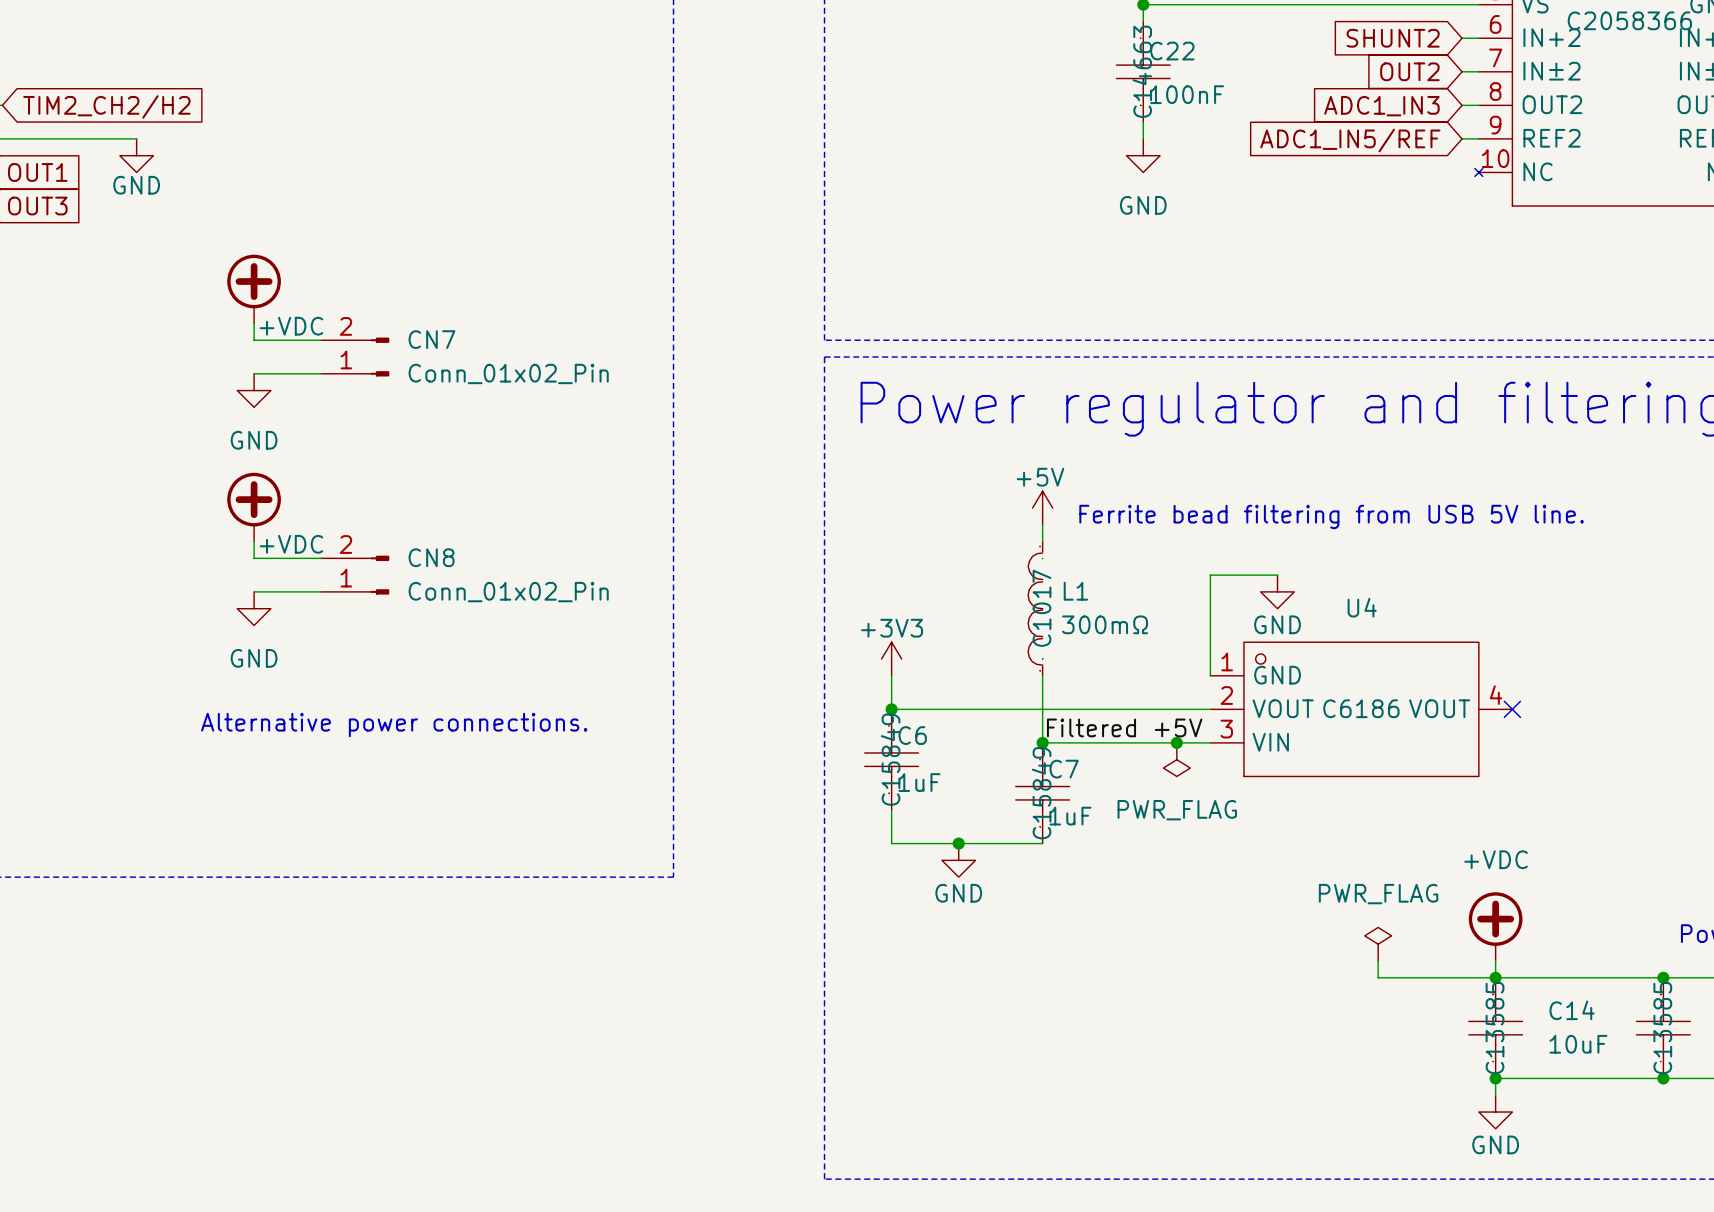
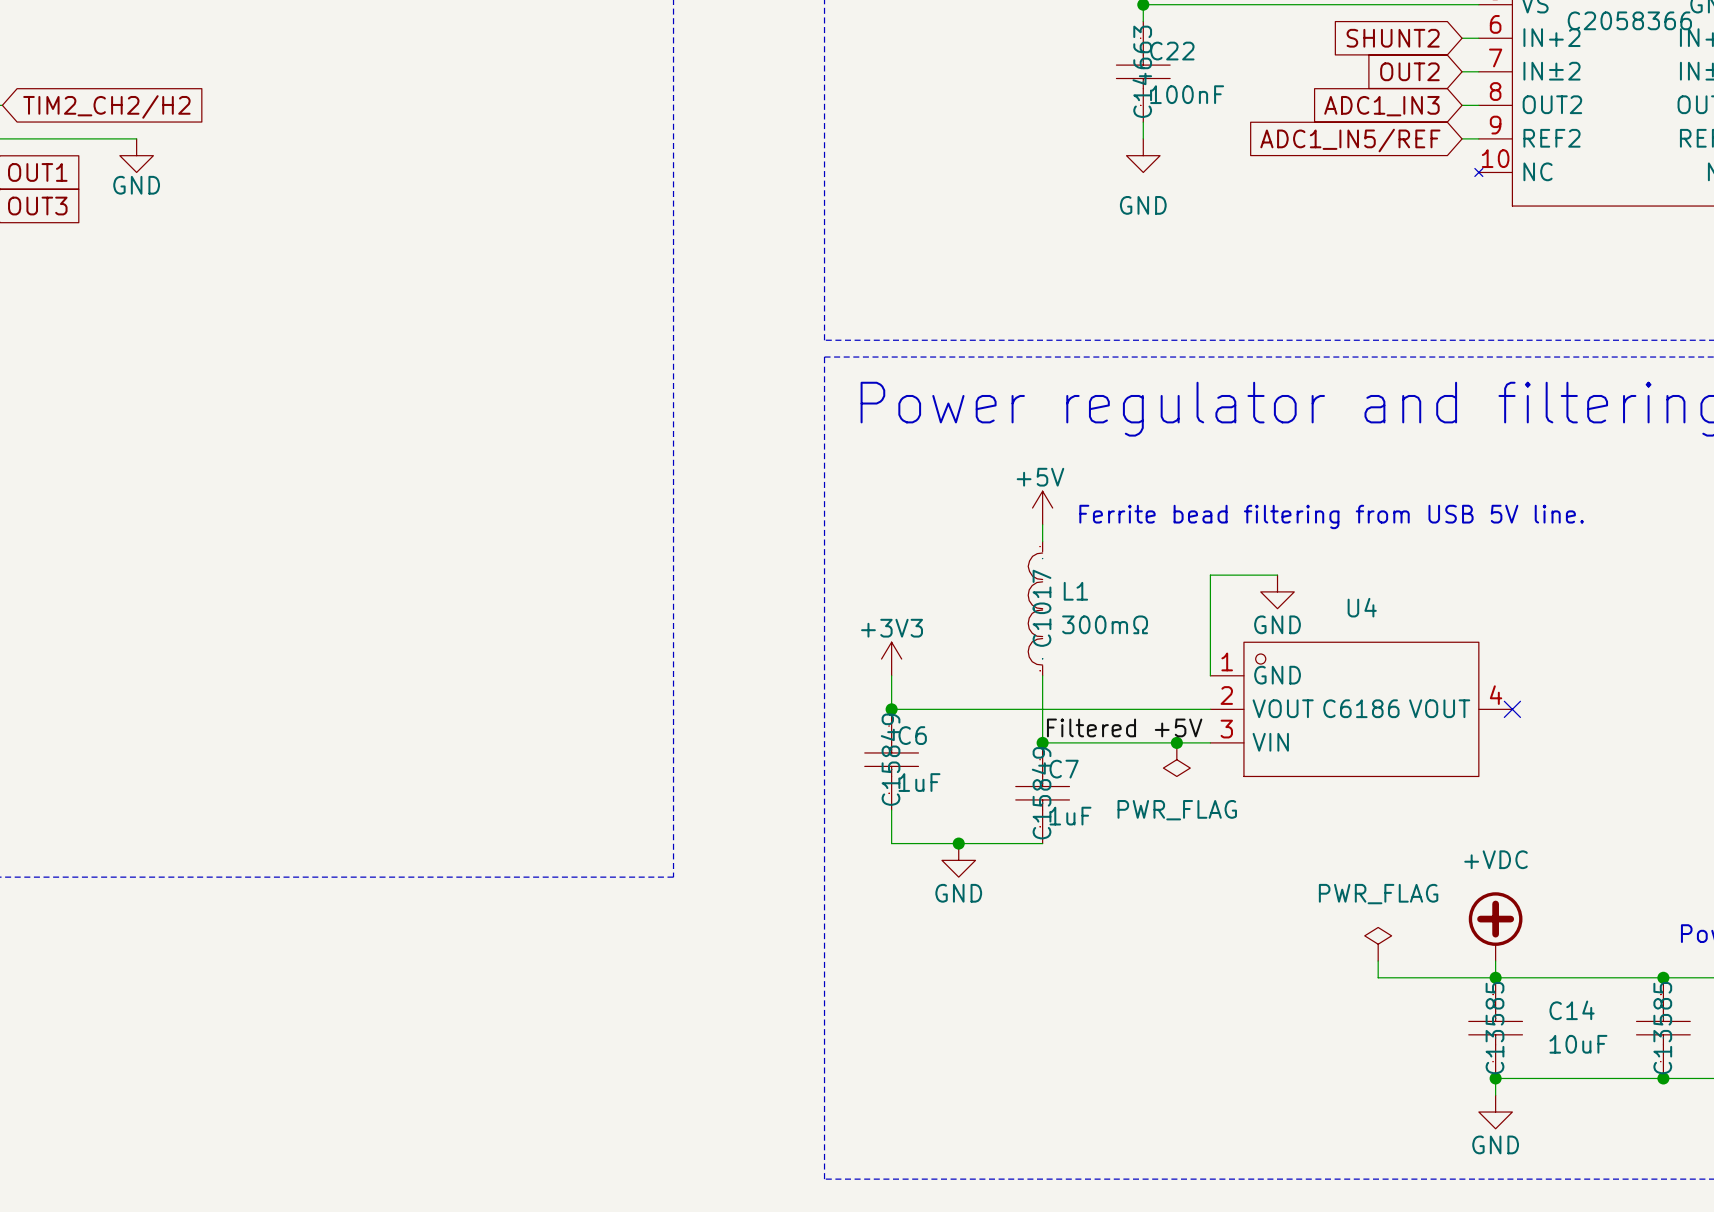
power symbol: +VDC (254, 289) -> none
wire: (254, 323) (254, 340) (321, 340) -> none
CN7: Conn_01x02_Pin (355, 357) -> none
wire: (254, 373) (321, 373) -> none
power symbol: GND (254, 390) -> none
power symbol: +VDC (254, 507) -> none
wire: (254, 541) (254, 558) (321, 558) -> none
CN8: Conn_01x02_Pin (355, 575) -> none
wire: (254, 591) (321, 591) -> none
power symbol: GND (254, 608) -> none
text: Alternative power connections. (394, 725) -> none

